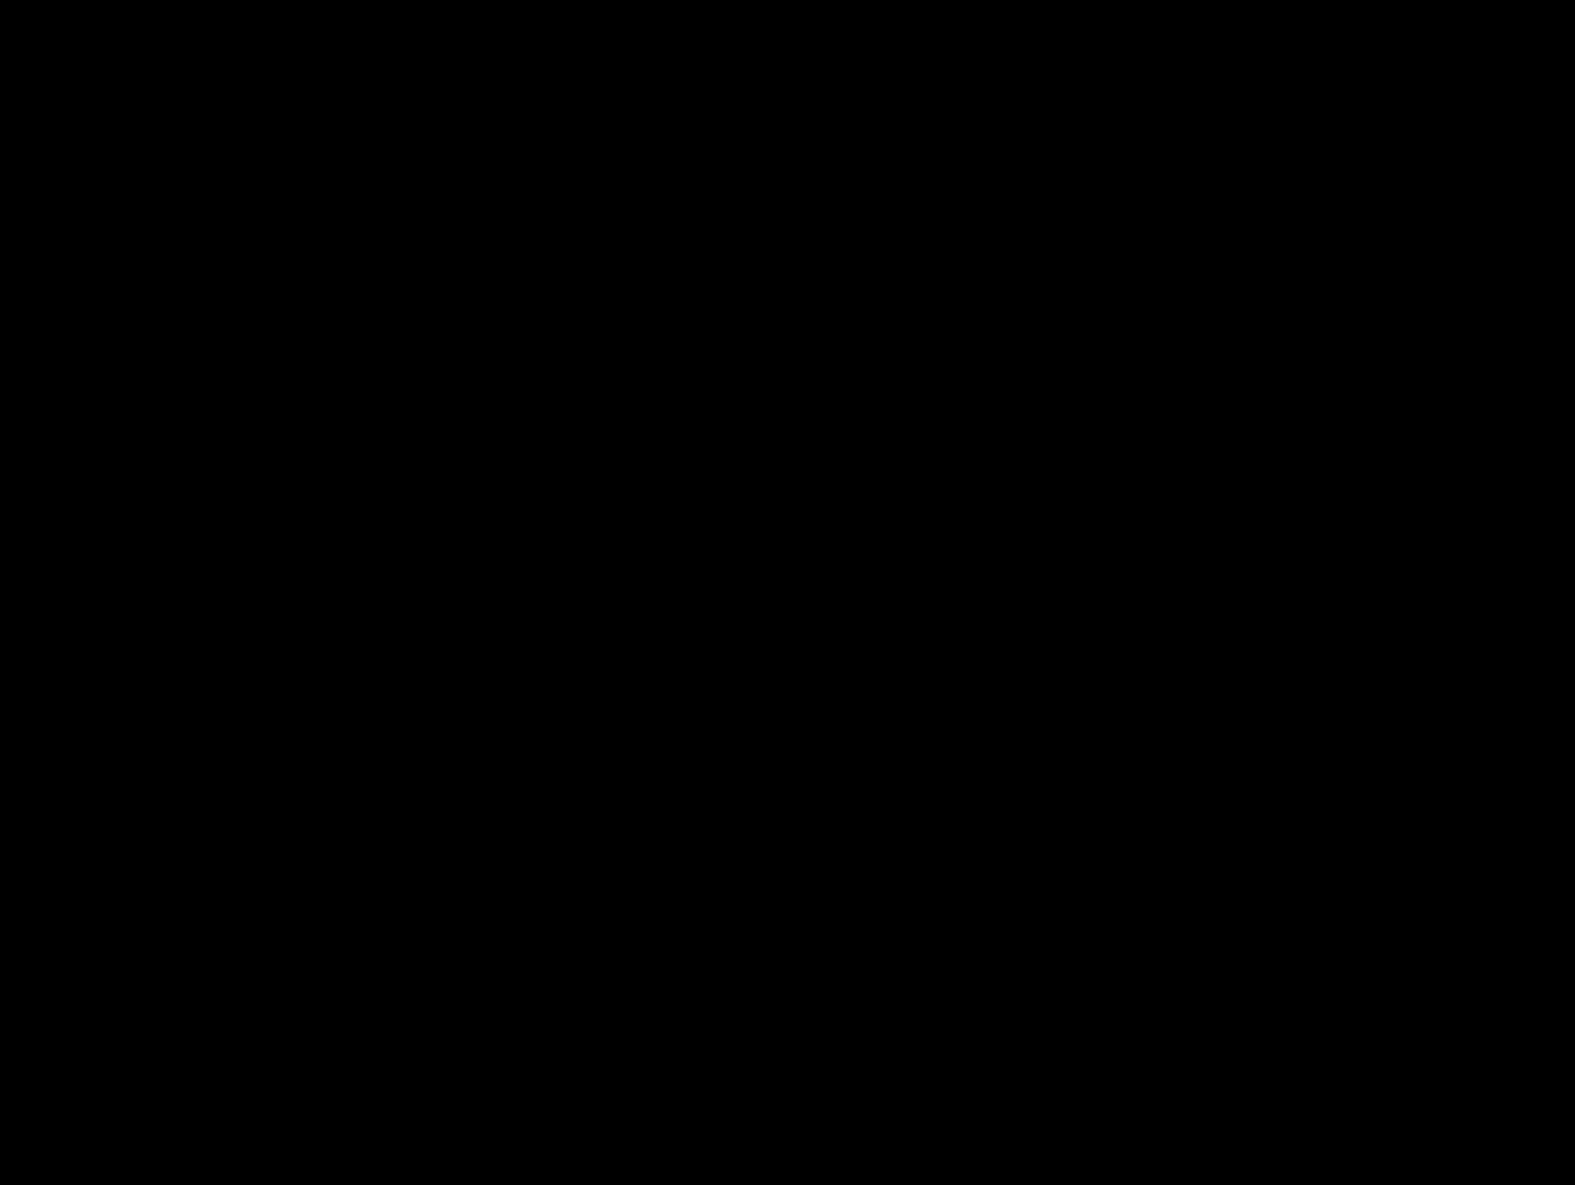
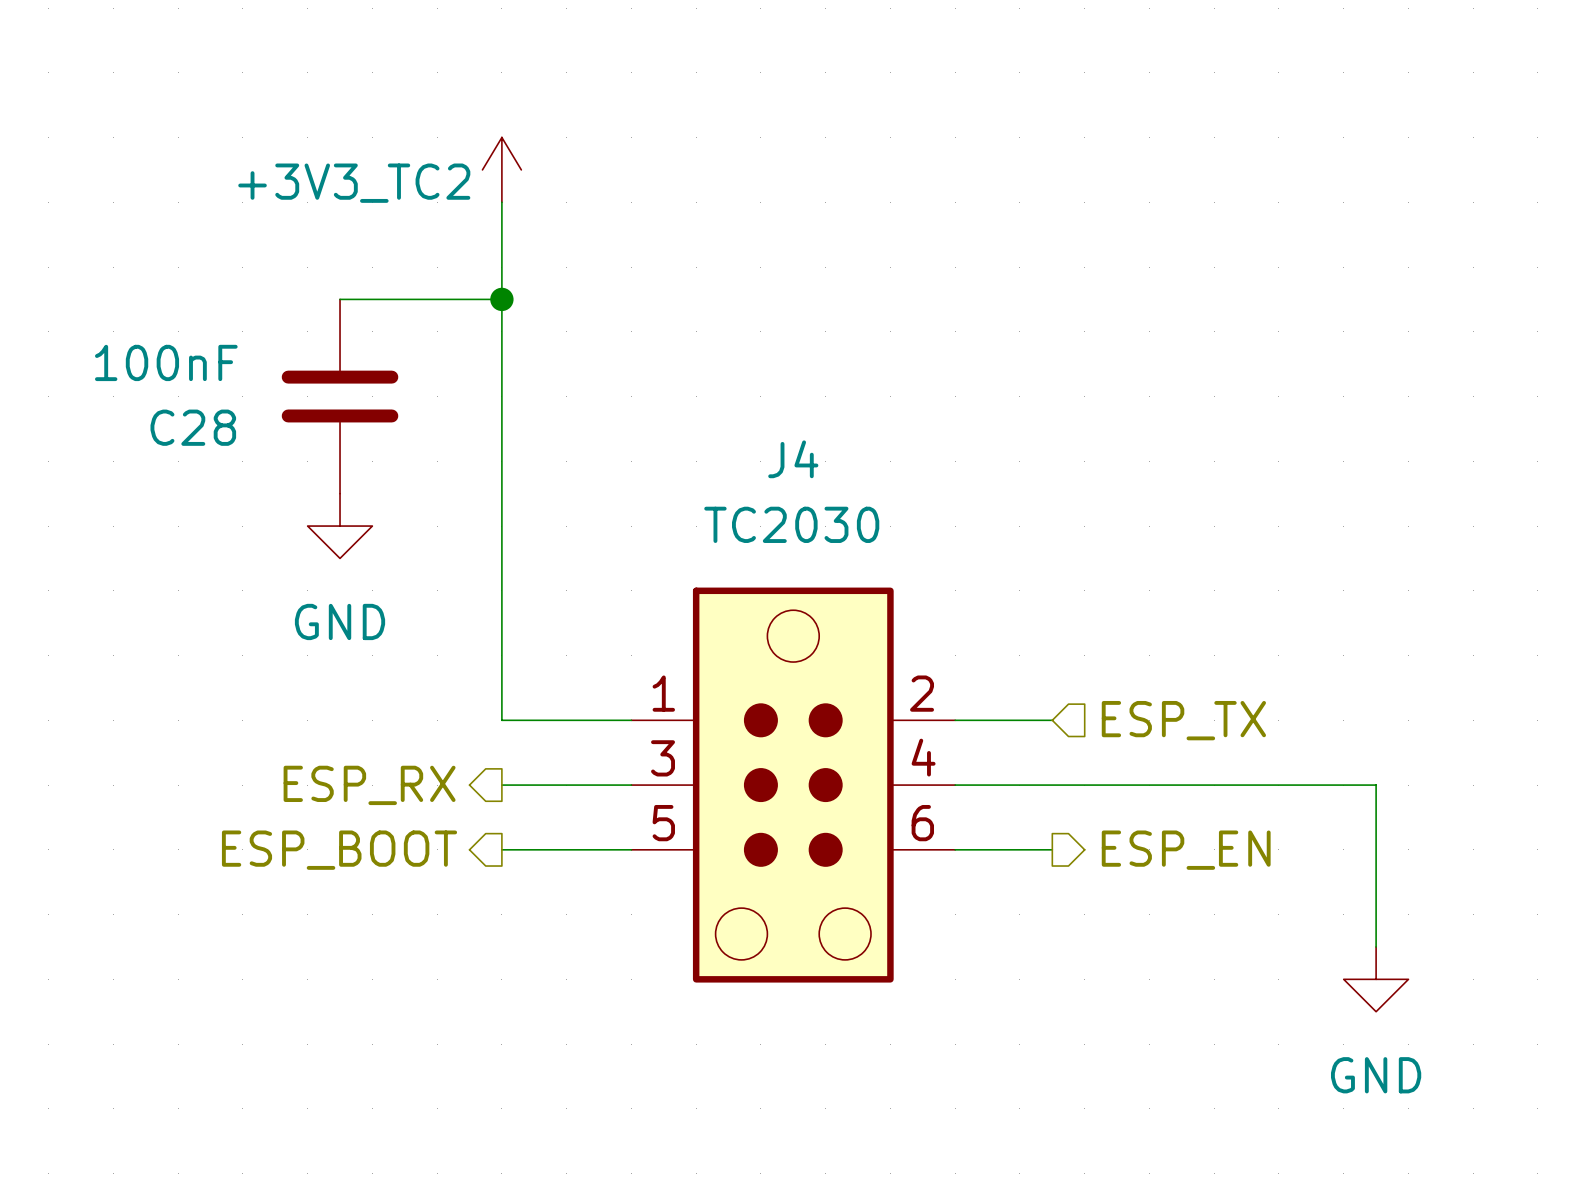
power symbol: none -> +3V3_TC2 (501, 169)
wire: none -> (501, 202) (501, 720) (631, 720)
wire: none -> (340, 299) (501, 299)
junction: none -> (501, 299)
C28: none -> 100nF (340, 396)
power symbol: none -> GND (340, 526)
wire: none -> (955, 720) (1052, 720)
hierarchical label: none -> ESP_TX (1183, 720)
hierarchical label: none -> ESP_RX (369, 785)
wire: none -> (501, 785) (631, 785)
J4: none -> TC2030 (793, 785)
wire: none -> (955, 785) (1376, 785) (1376, 946)
wire: none -> (501, 849) (631, 849)
wire: none -> (955, 849) (1052, 849)
hierarchical label: none -> ESP_BOOT (339, 850)
hierarchical label: none -> ESP_EN (1186, 850)
power symbol: none -> GND (1376, 979)

